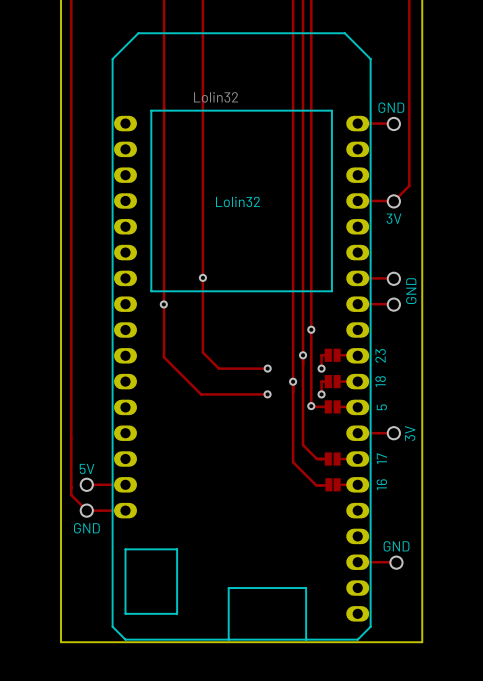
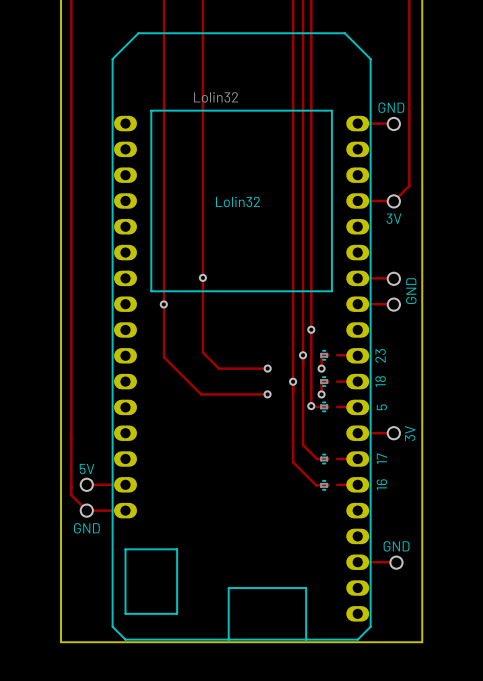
part footprint: [324, 348, 341, 362] -> [320, 350, 329, 361]
part footprint: [324, 375, 341, 389] -> [320, 376, 329, 387]
part footprint: [324, 400, 341, 414] -> [320, 401, 329, 412]
part footprint: [324, 452, 341, 466] -> [320, 453, 329, 465]
part footprint: [325, 478, 341, 492] -> [320, 480, 329, 491]

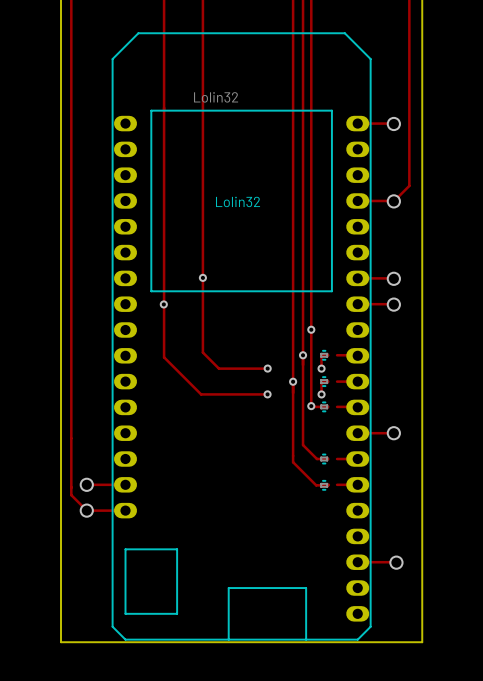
text: GND (391, 107) -> none
text: 3V (393, 218) -> none
text: GND (411, 291) -> none
text: 23 (380, 355) -> none
text: 18 (380, 381) -> none
text: 5 (381, 407) -> none
text: 3V (410, 433) -> none
text: 17 (381, 458) -> none
text: 5V (87, 469) -> none
text: 16 (381, 484) -> none
text: GND (86, 528) -> none
text: GND (396, 546) -> none

